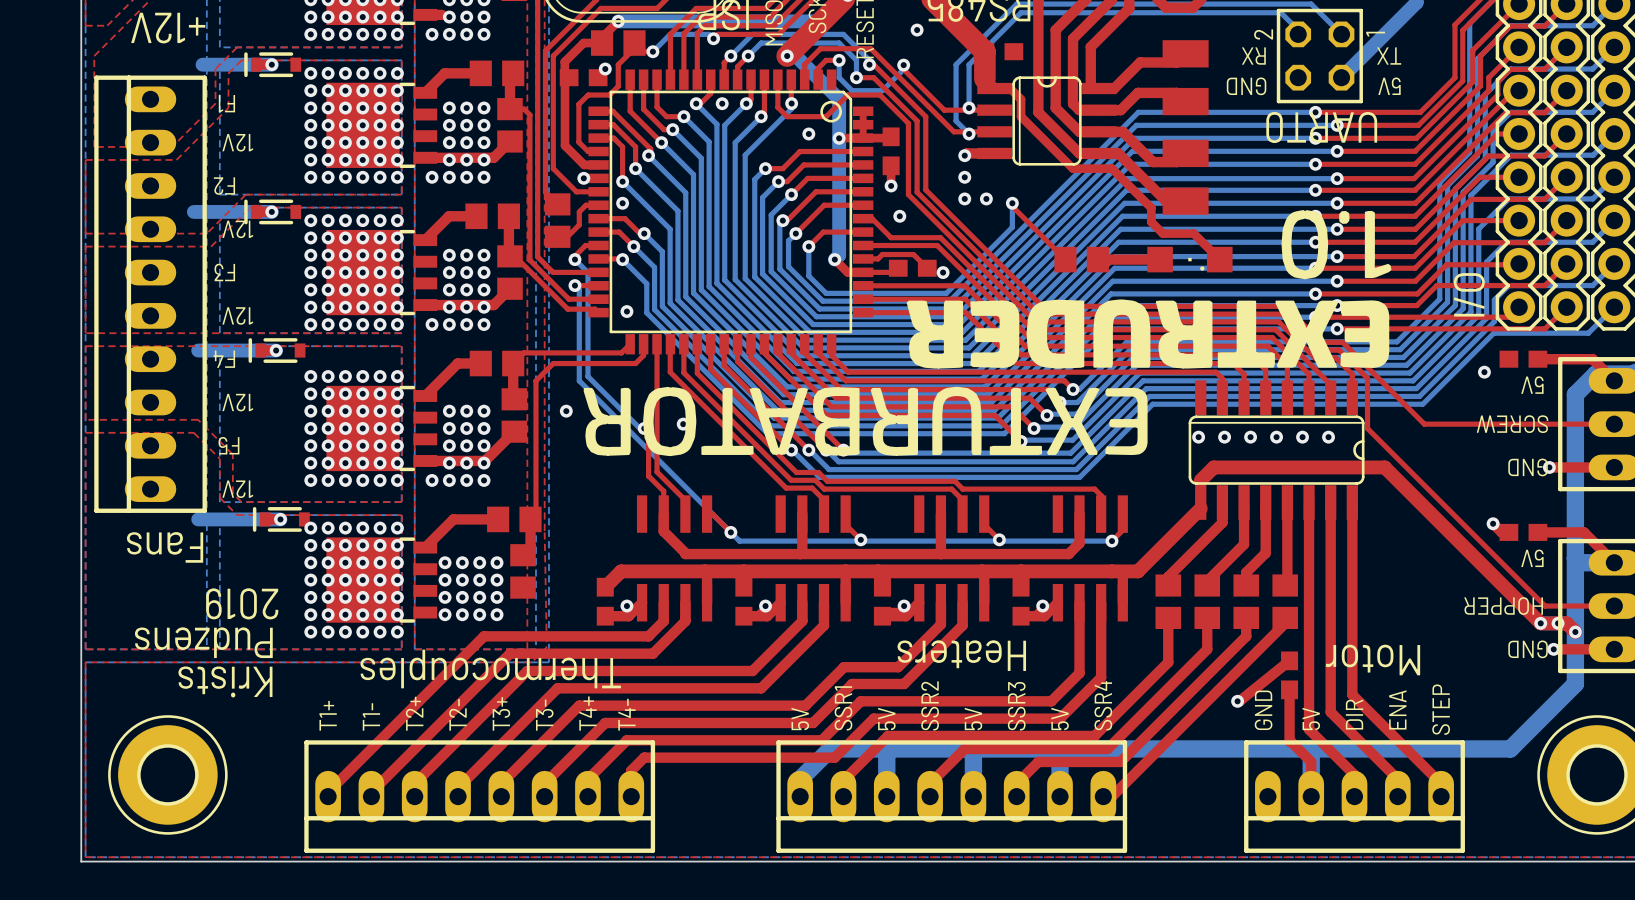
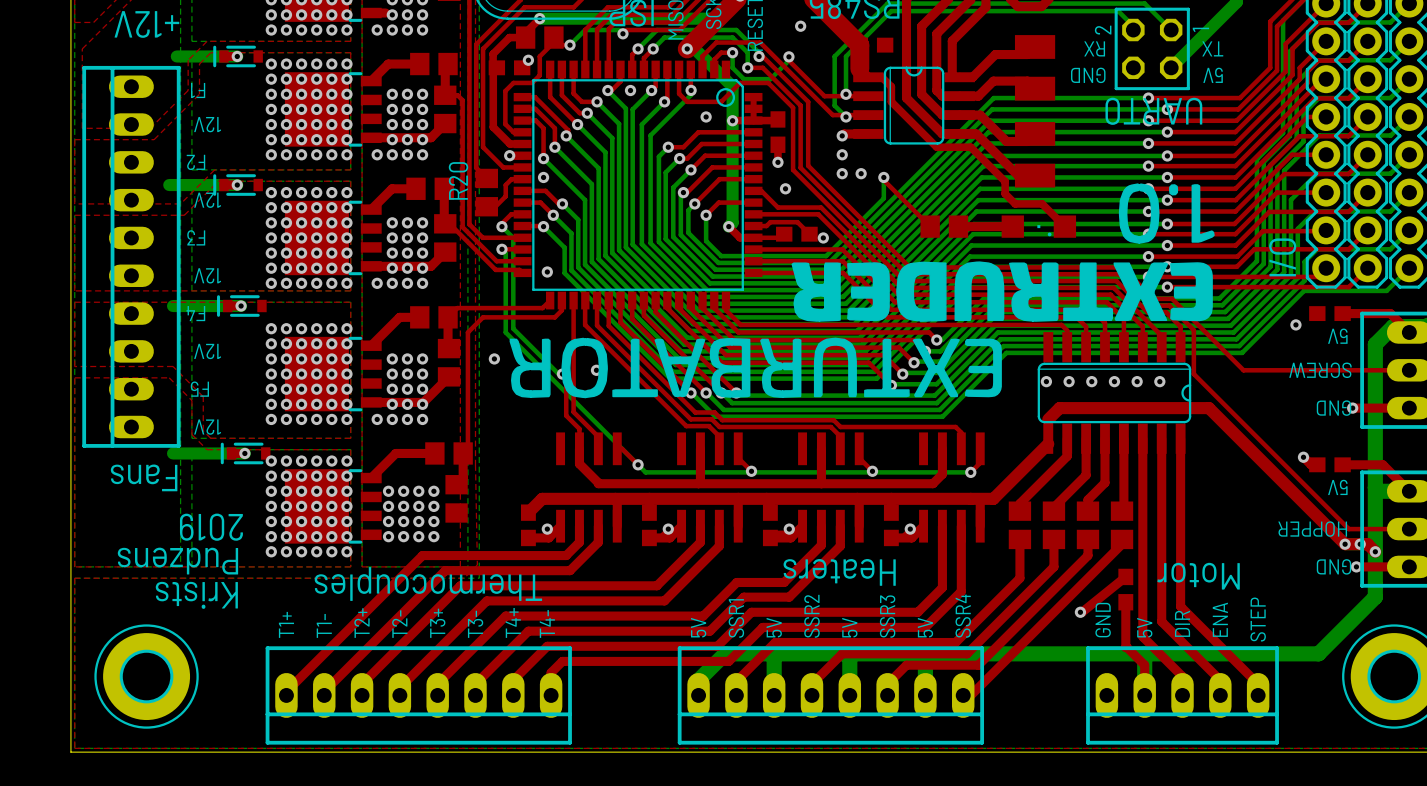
R20 name: none -> R20 (458, 180)

